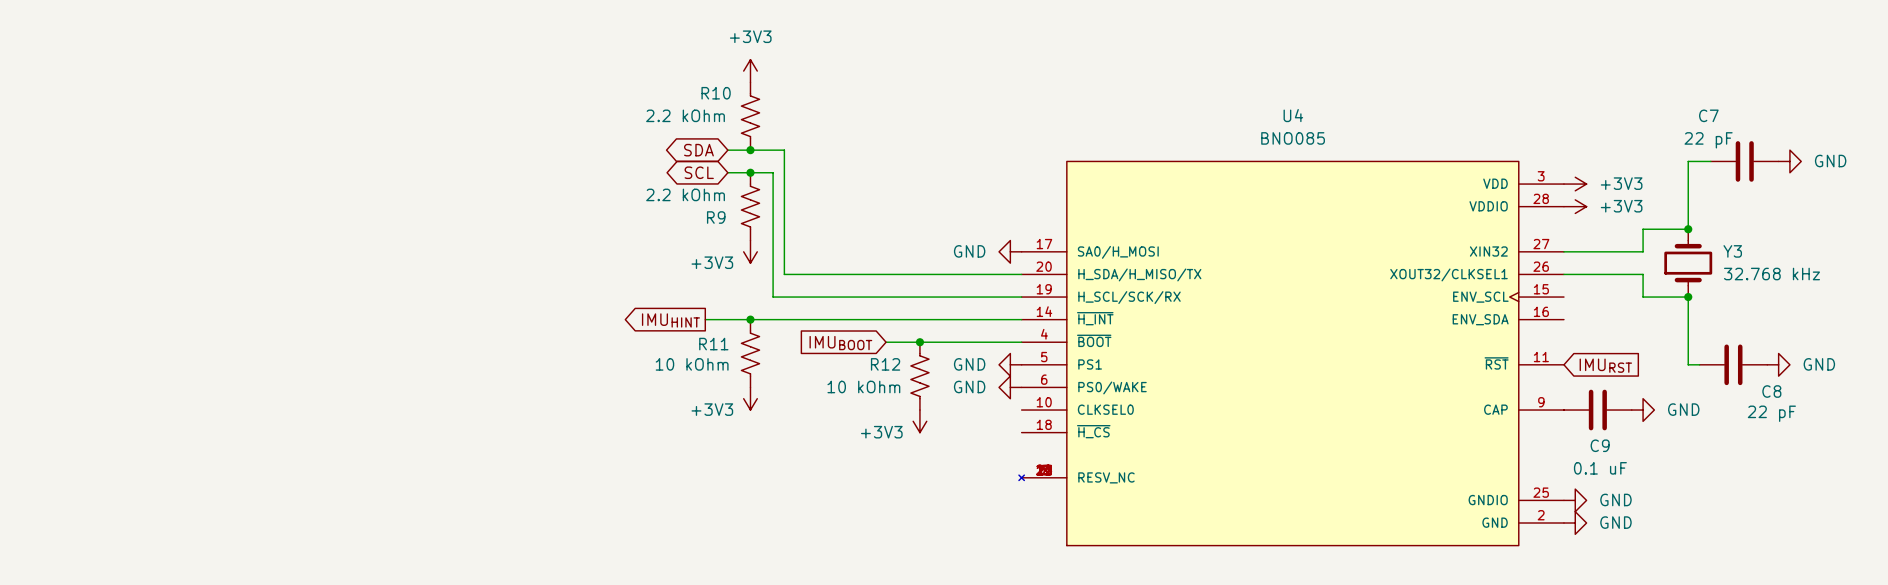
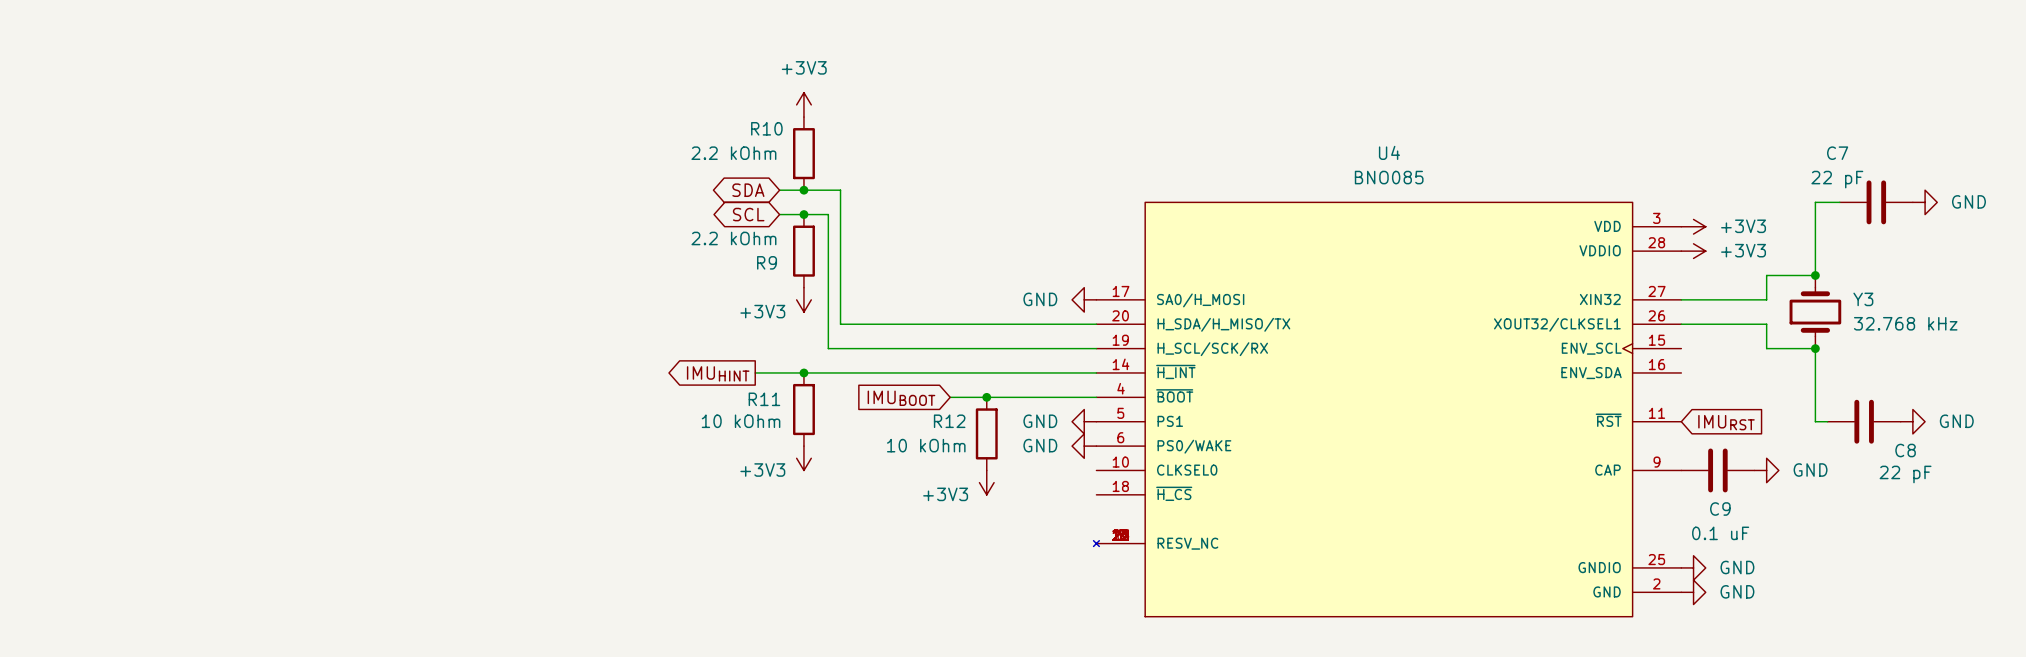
R10 symbol: [741, 82, 760, 151] -> [793, 117, 815, 191]
R9 symbol: [741, 172, 760, 241] -> [793, 214, 815, 288]
R11 symbol: [741, 319, 760, 388] -> [793, 372, 815, 447]
R12 symbol: [910, 342, 930, 411] -> [975, 397, 998, 471]

